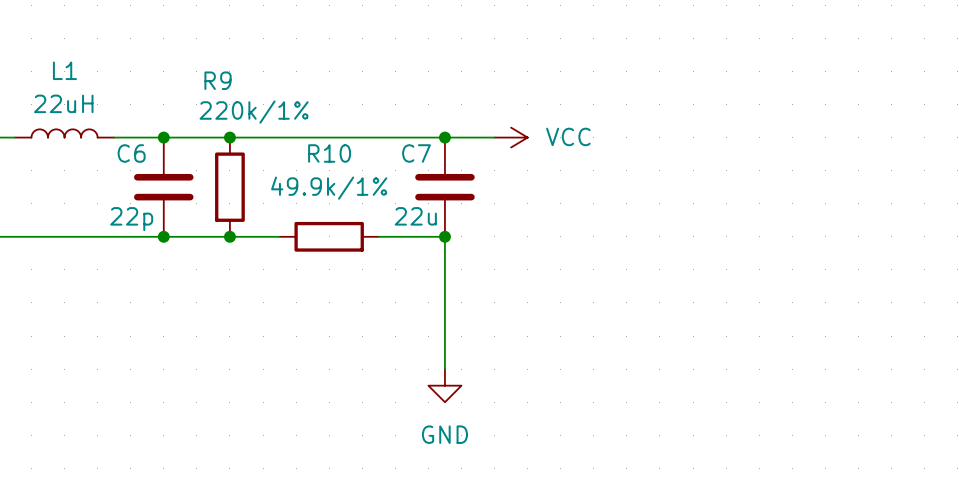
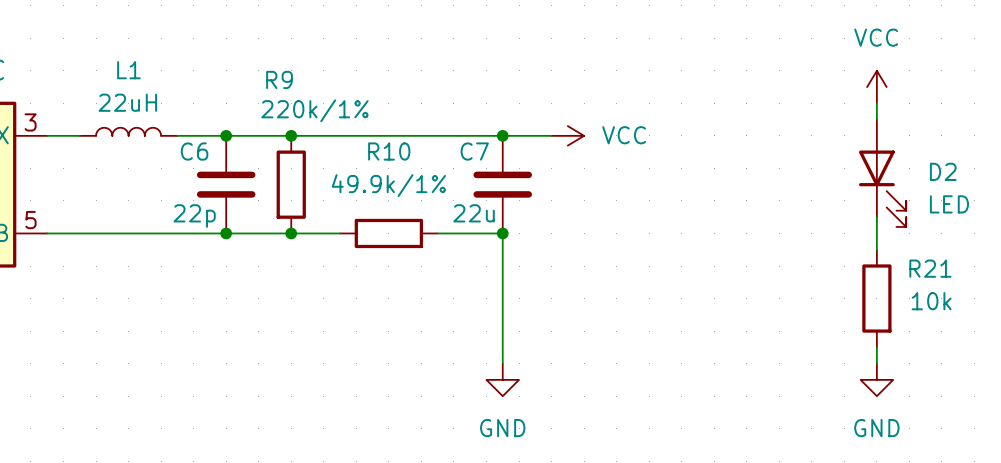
power symbol: none -> VCC (876, 87)
wire: none -> (876, 103) (876, 119)
D2: none -> LED (882, 173)
wire: none -> (876, 217) (876, 249)
R21: none -> 10k (876, 298)
wire: none -> (876, 347) (876, 363)
power symbol: none -> GND (876, 379)

